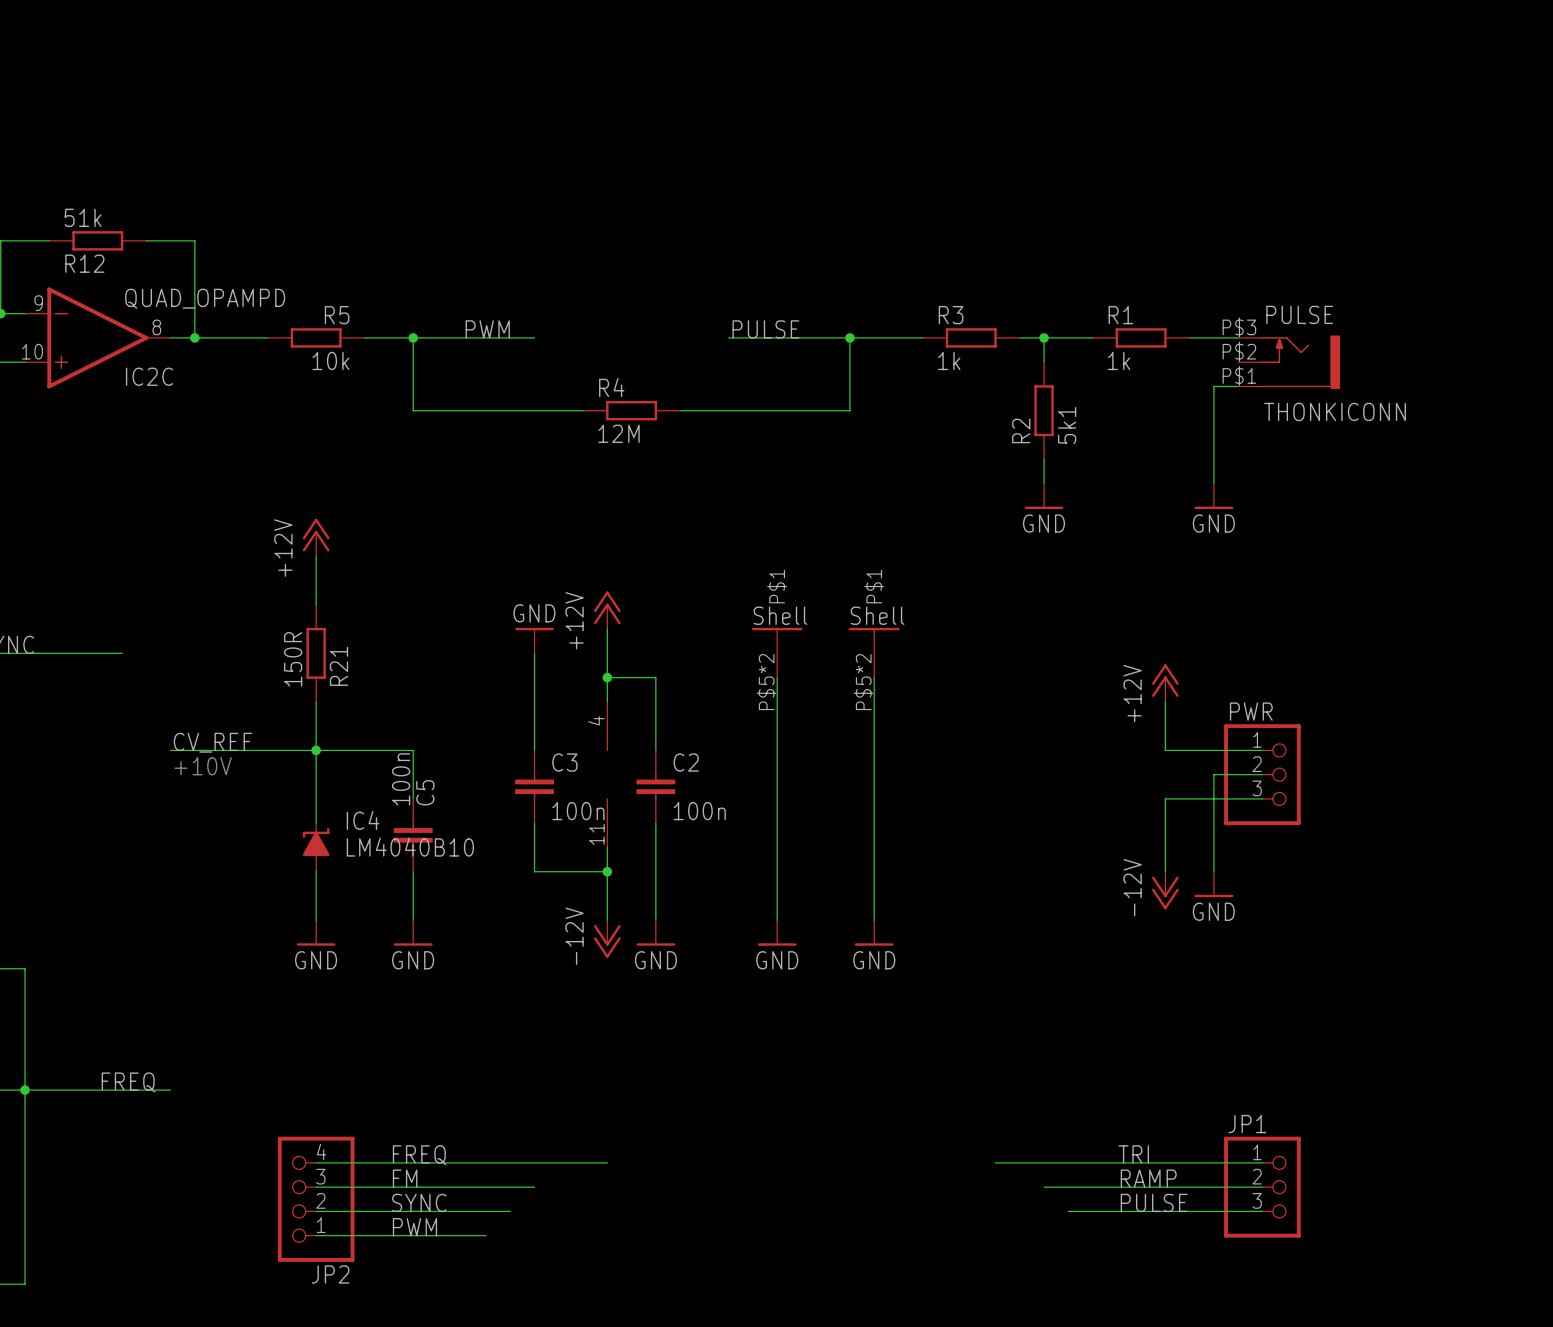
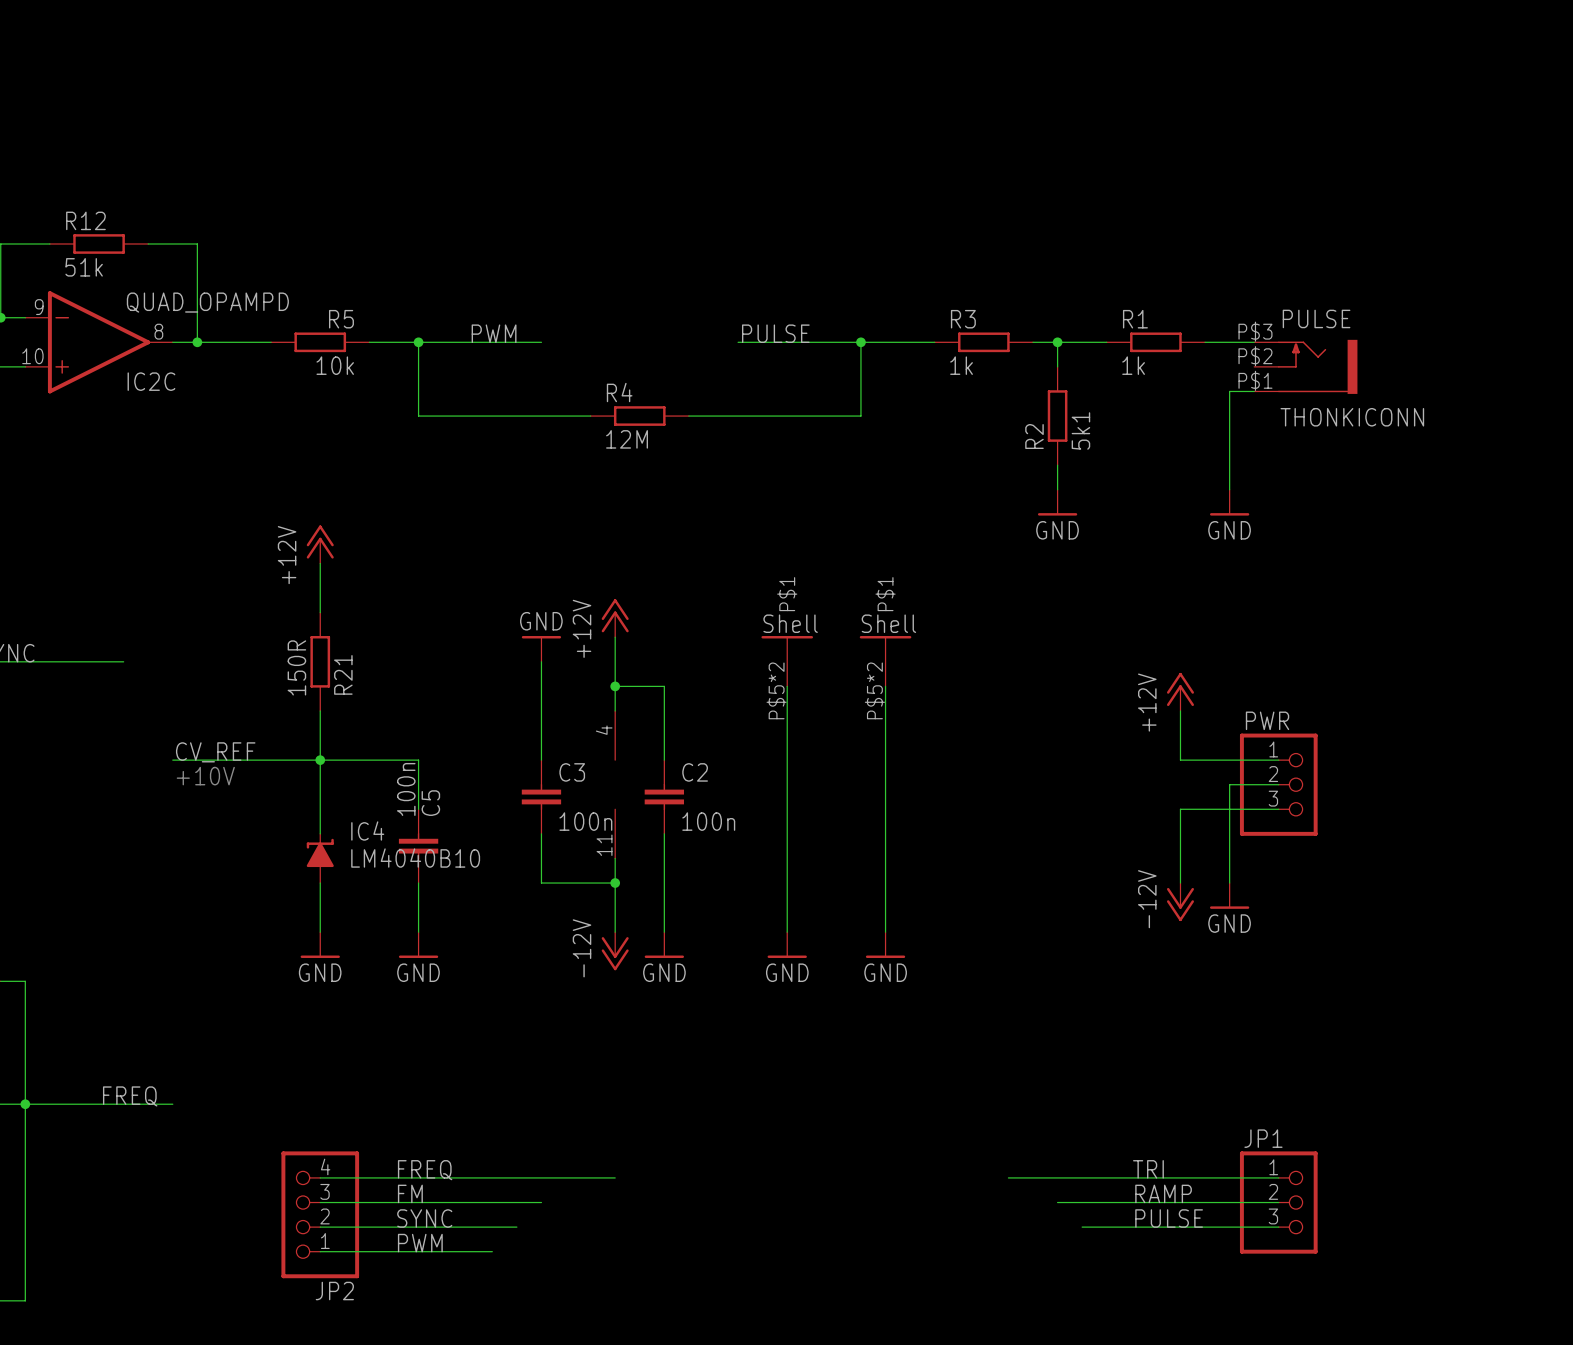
R12 value position: 51k (83, 217) -> 51k (84, 267)
R12 name position: R12 (84, 263) -> R12 (85, 220)

